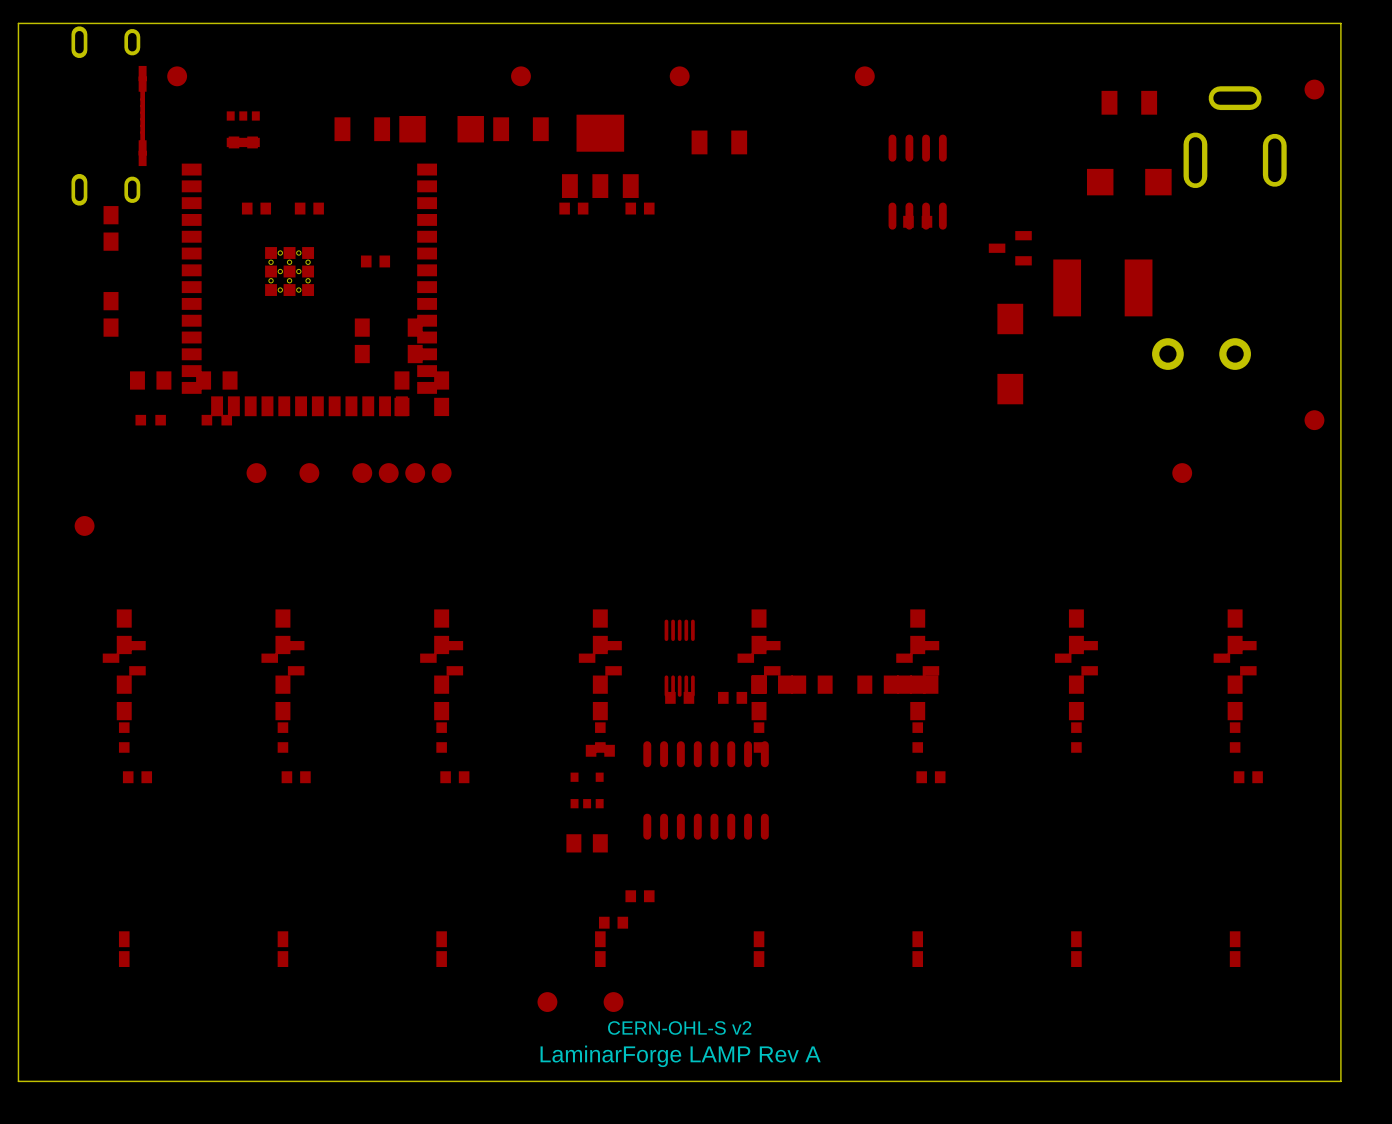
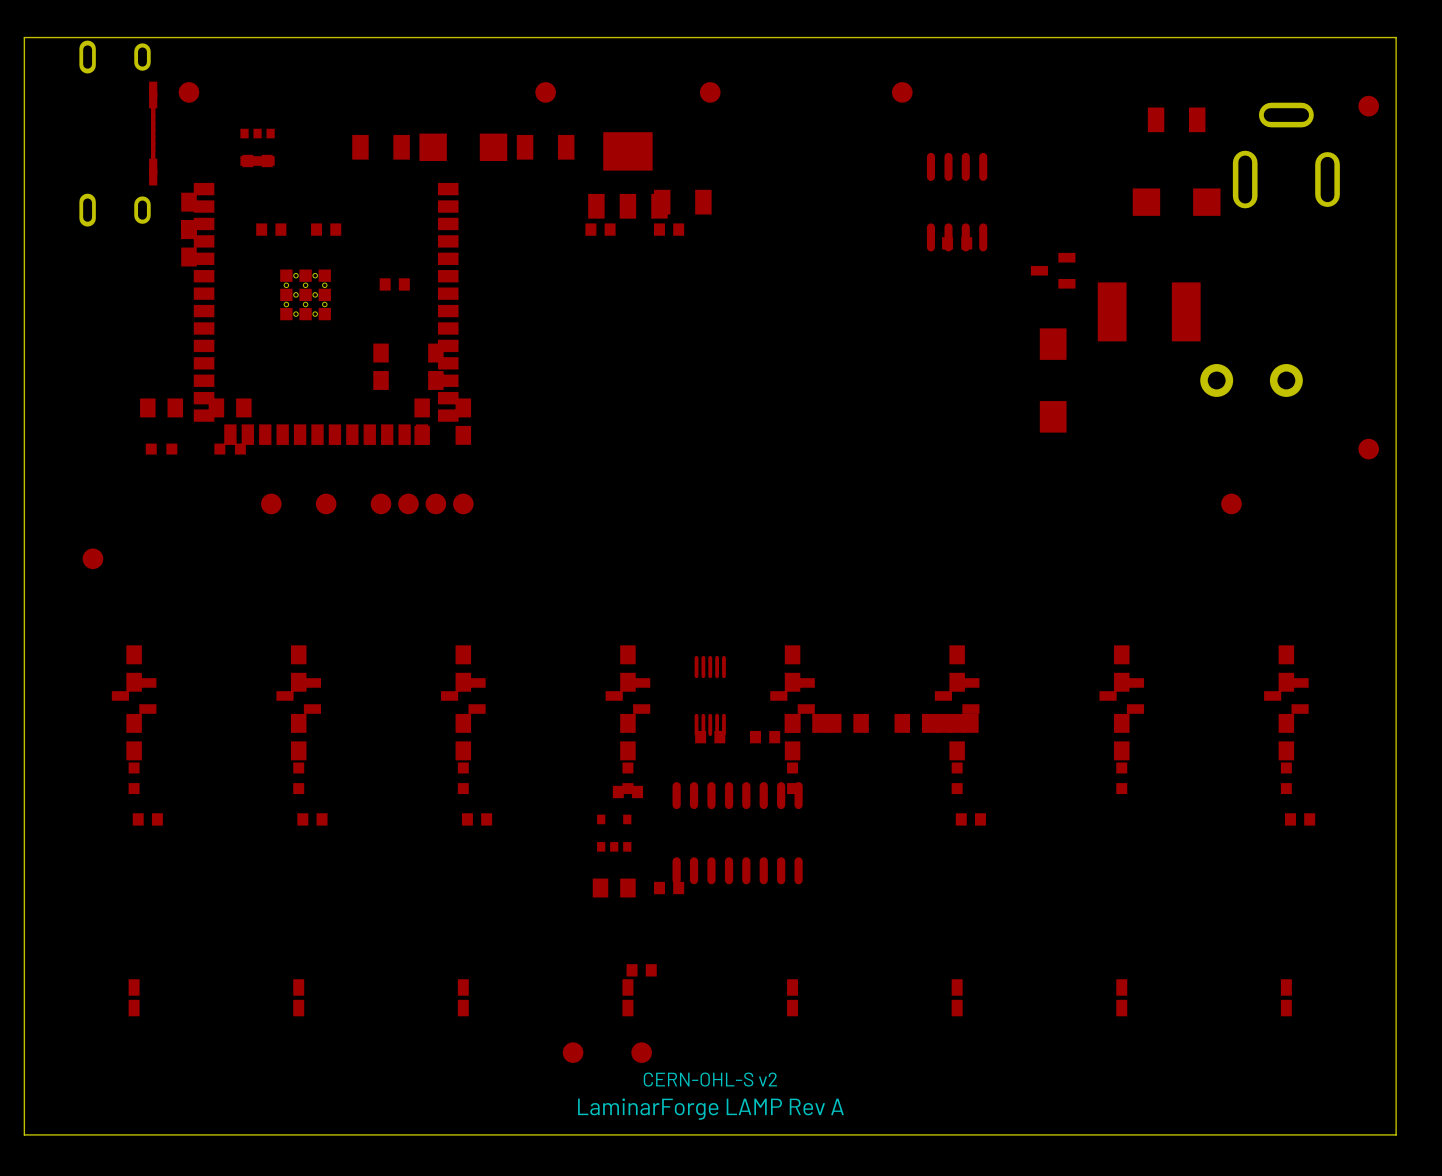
part position: (719, 142) -> (682, 202)
part: none -> (188, 215)
part: none -> (188, 243)
part: (111, 228) -> none
part: (111, 314) -> none
part position: (640, 896) -> (669, 888)

